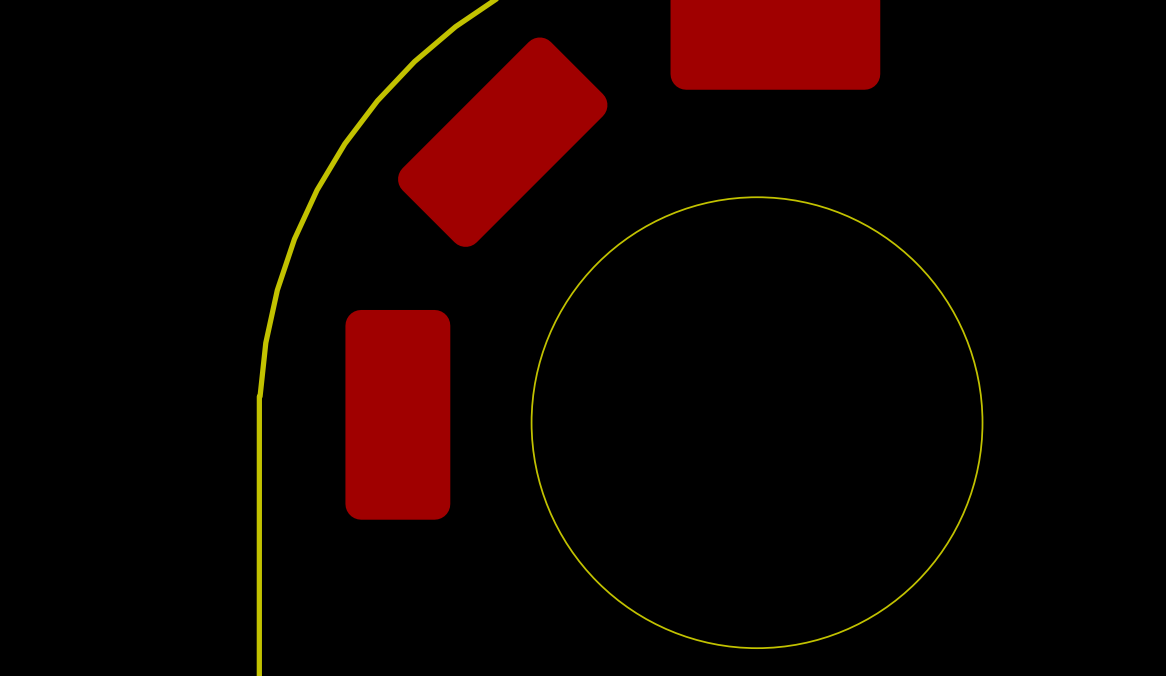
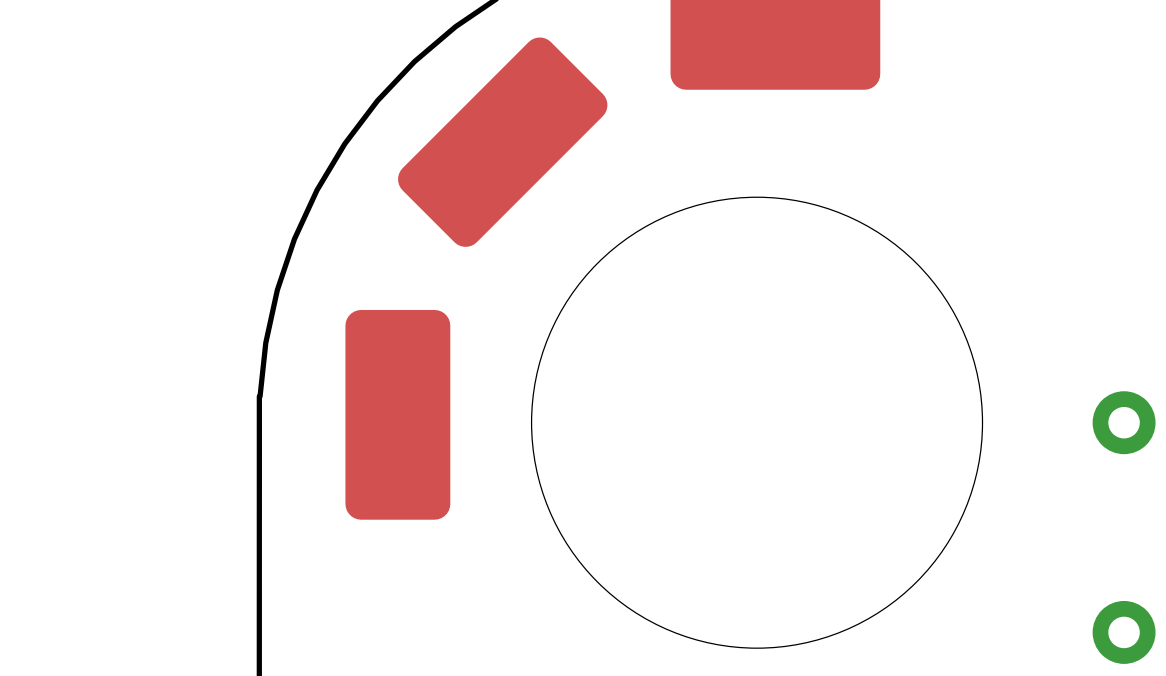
via: none -> (1124, 422)
via: none -> (1124, 632)

